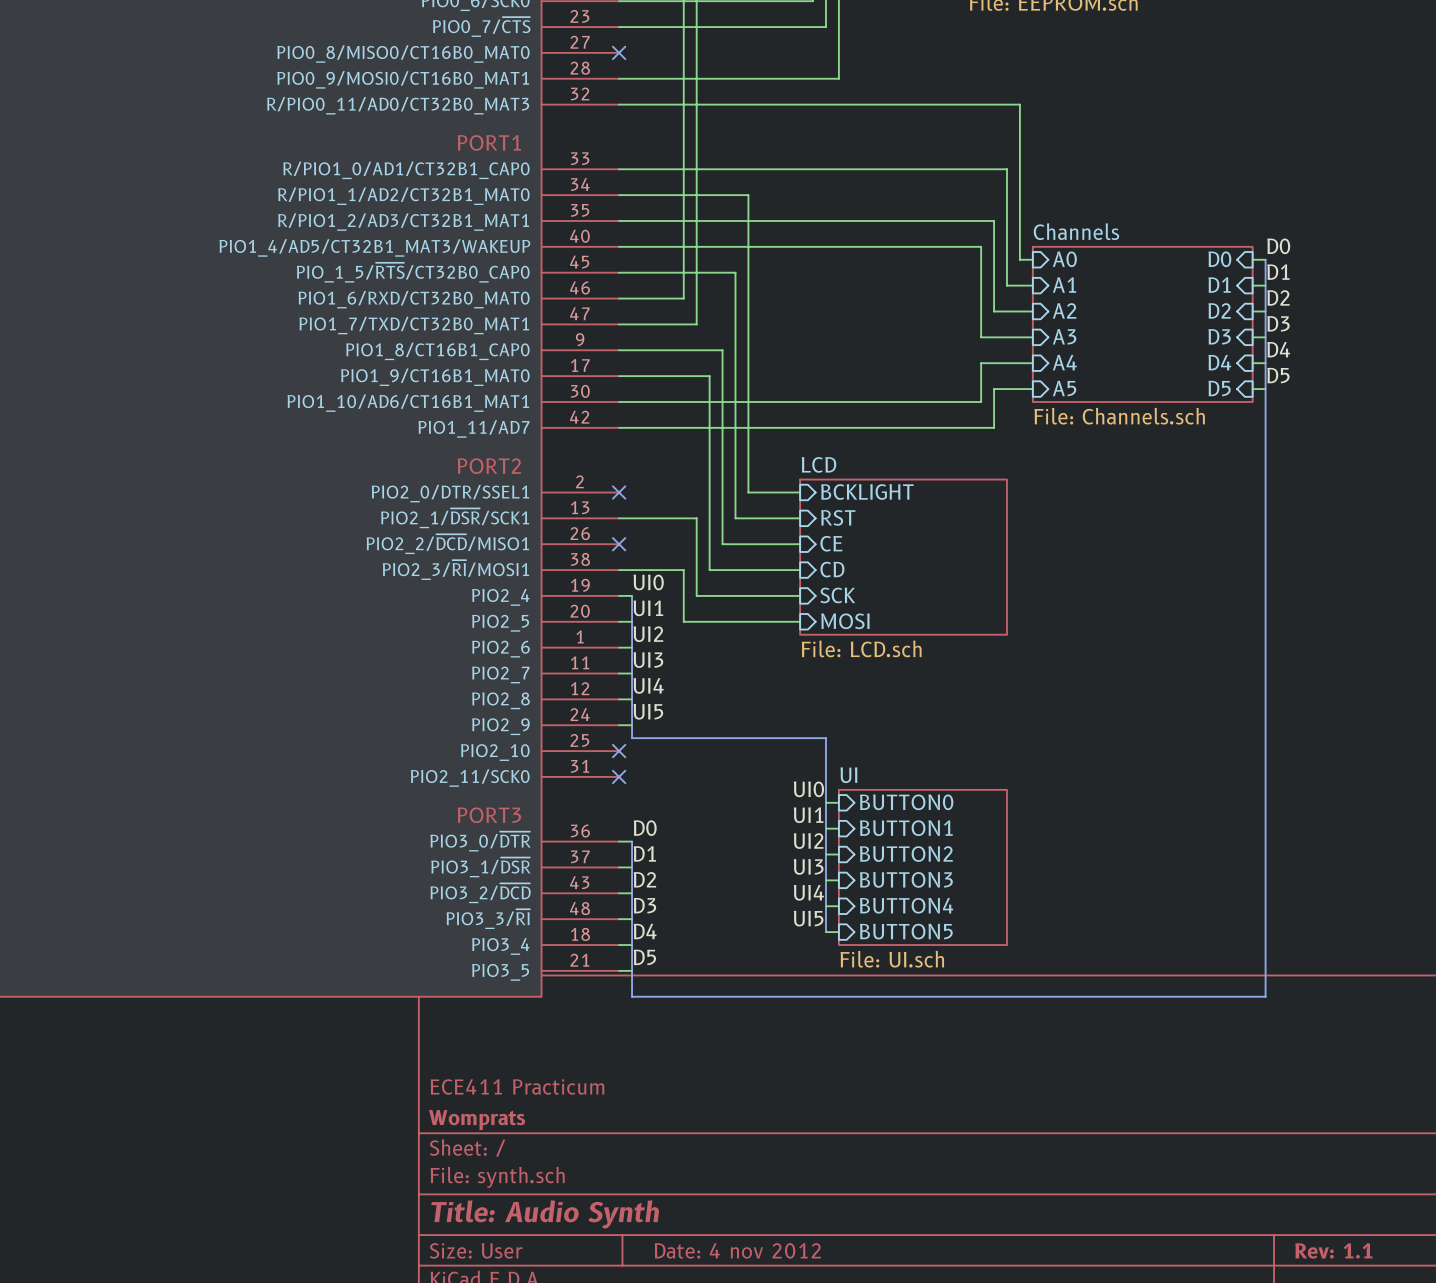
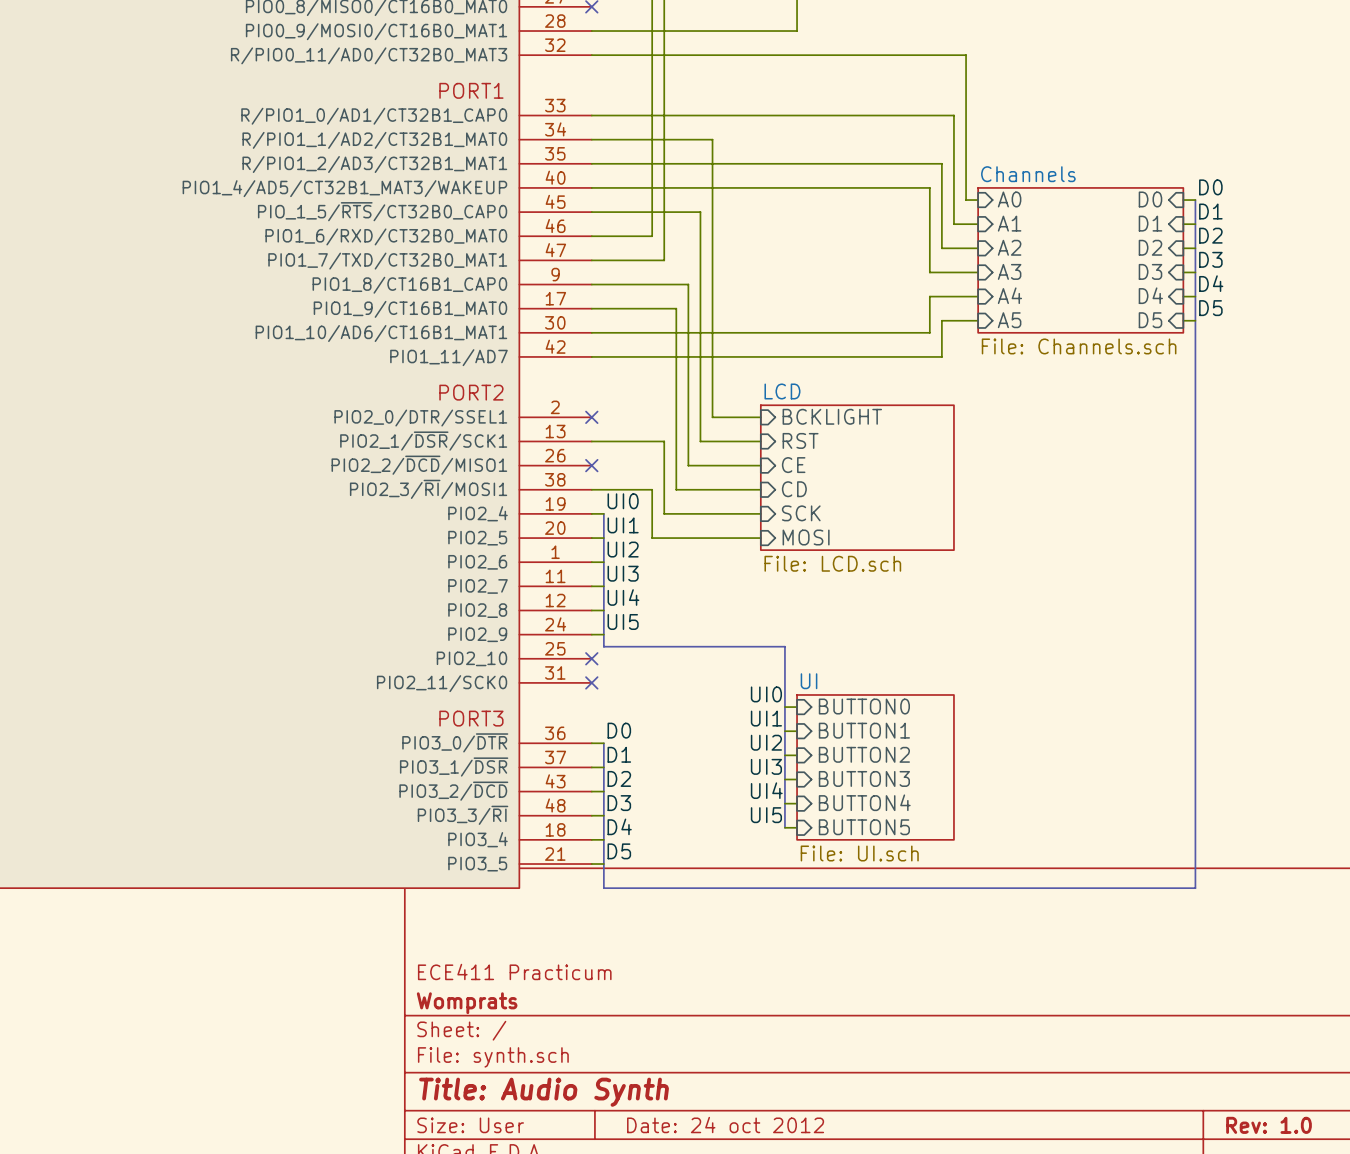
title block: Date: 4 nov 2012 (737, 1250) -> Date: 24 oct 2012 (725, 1125)
title block: Rev: 1.1 (1333, 1250) -> Rev: 1.0 (1269, 1125)

